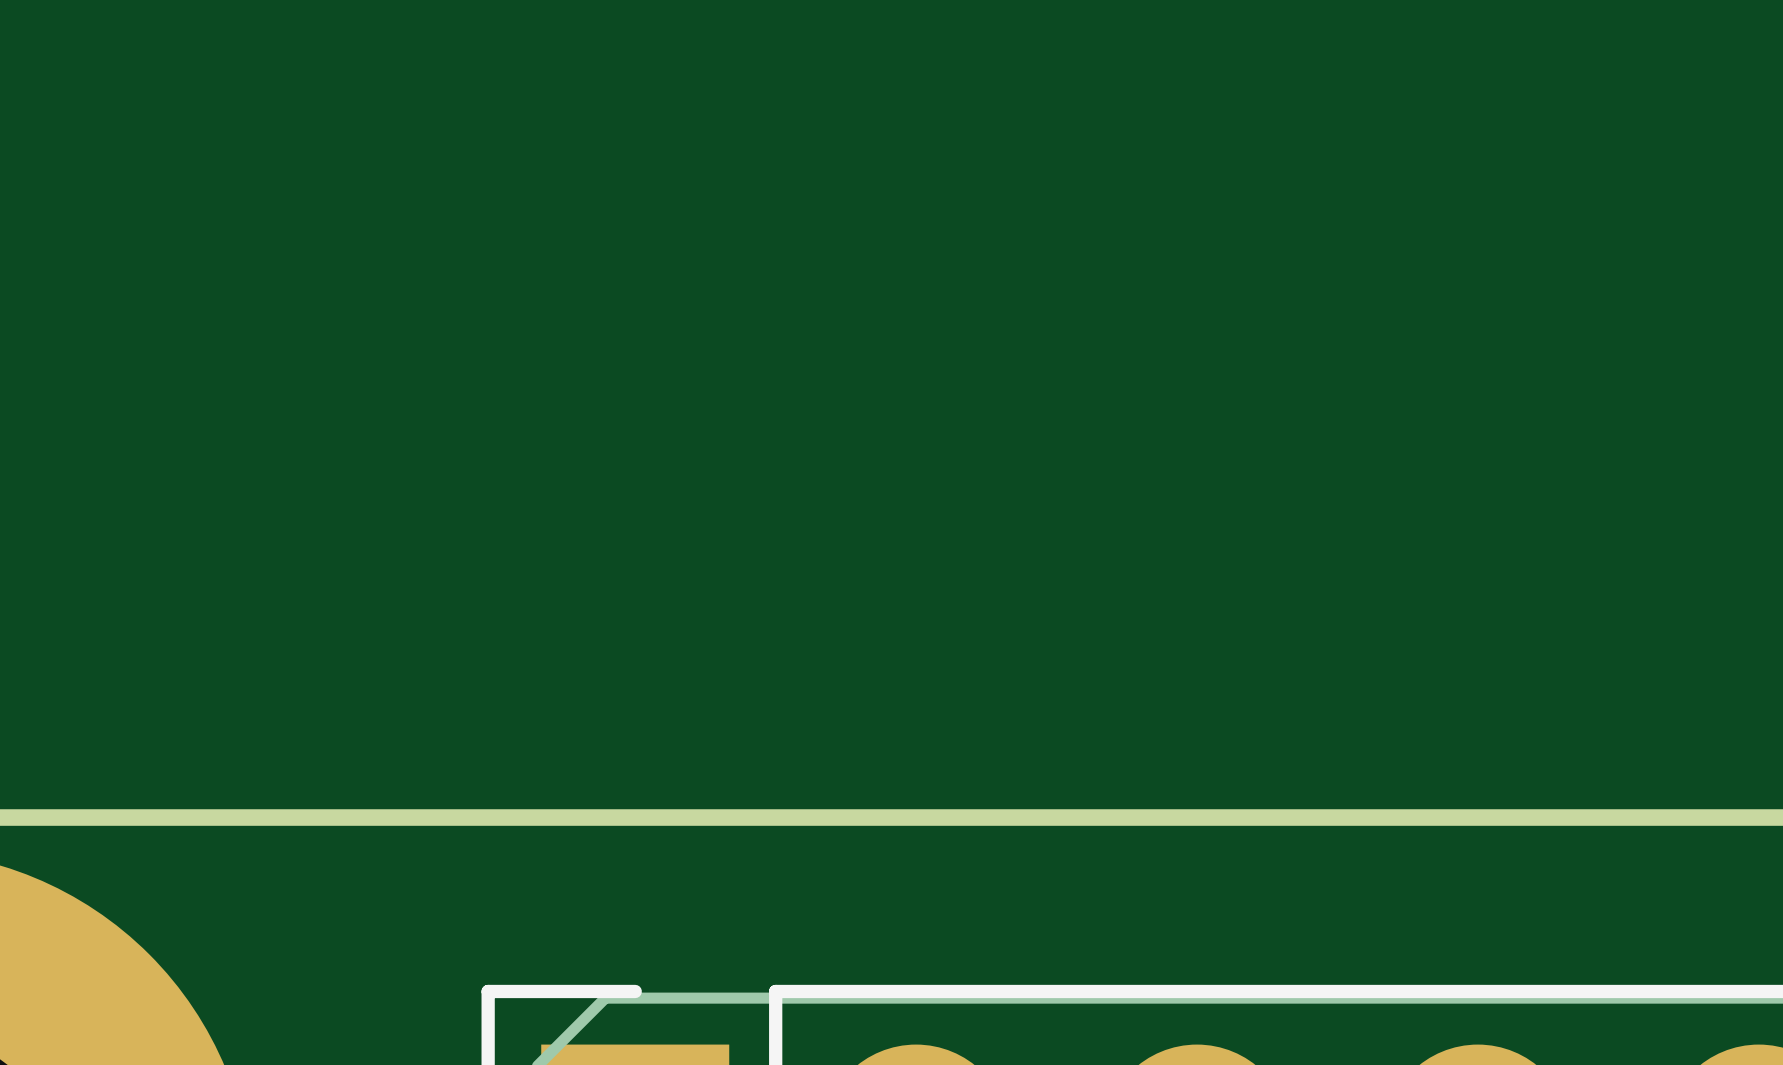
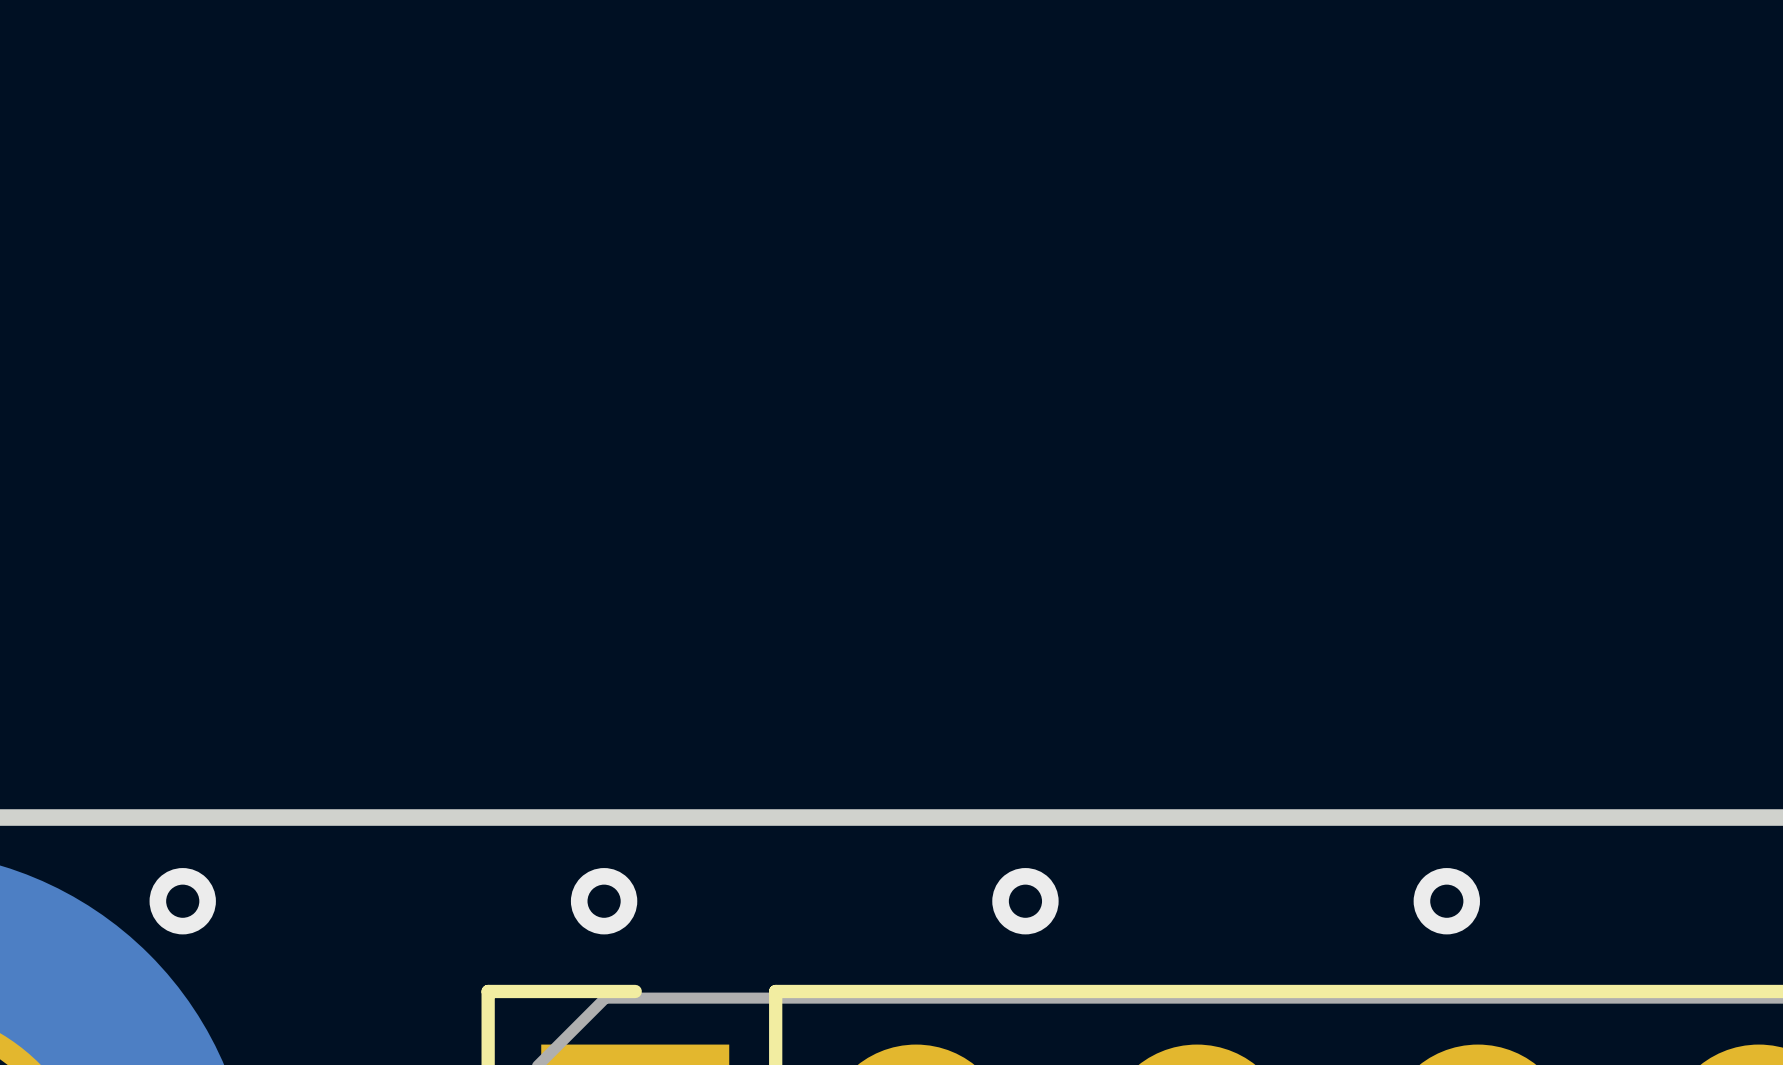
via: none -> (182, 901)
via: none -> (604, 901)
via: none -> (1025, 901)
via: none -> (1446, 901)

